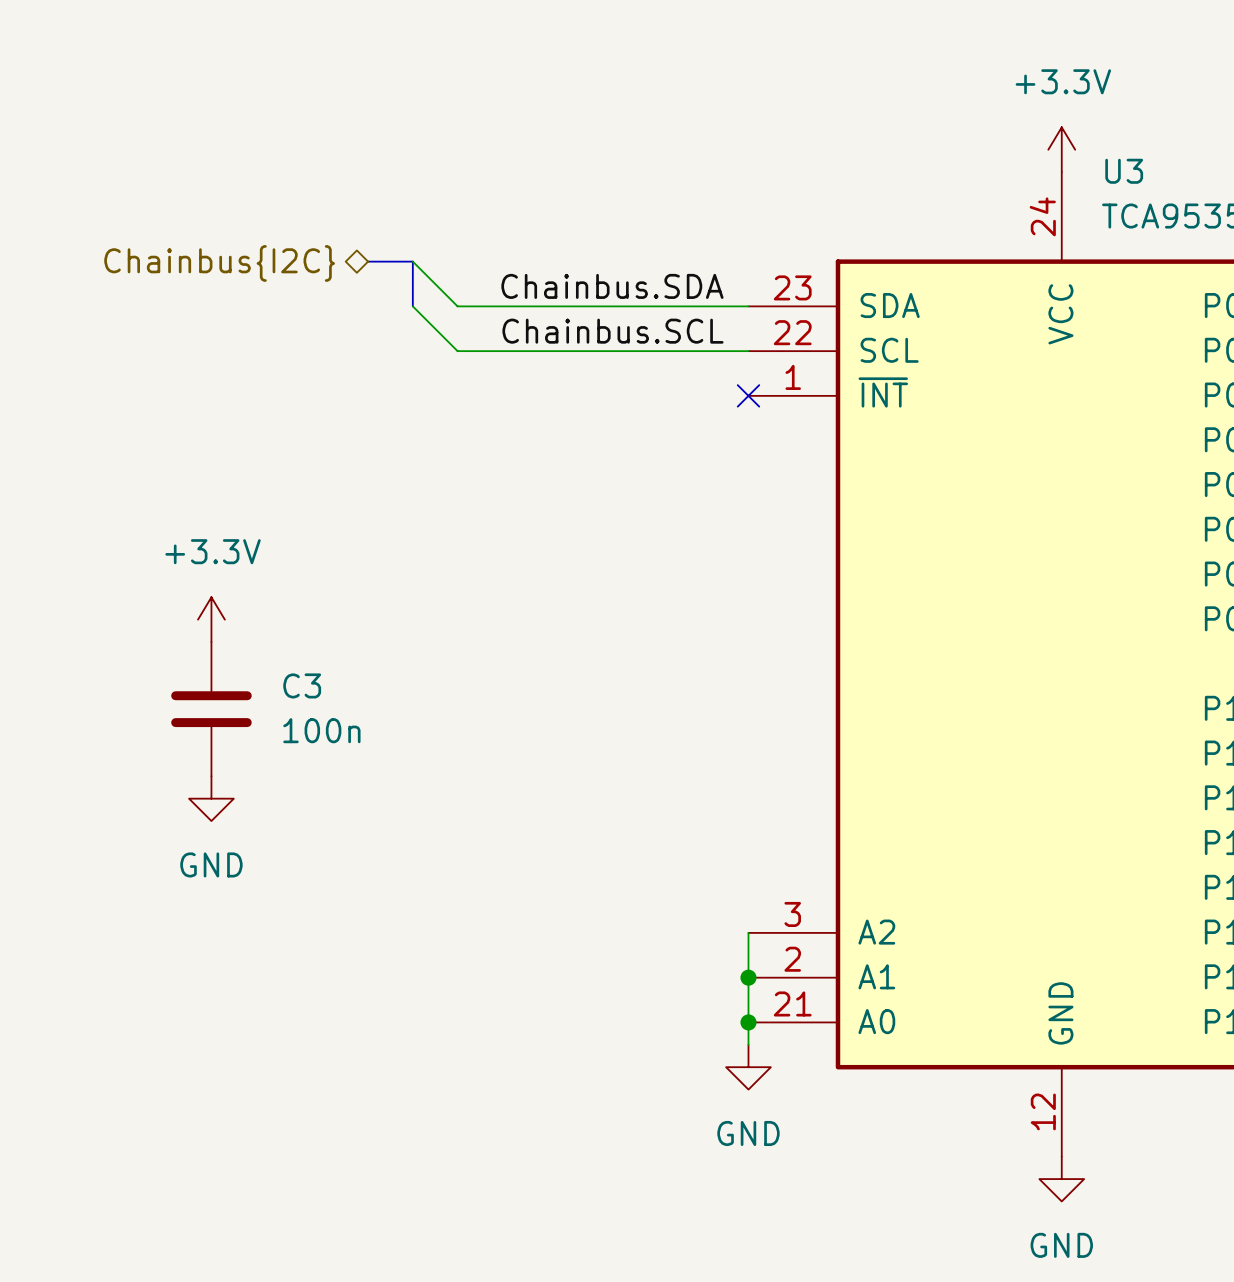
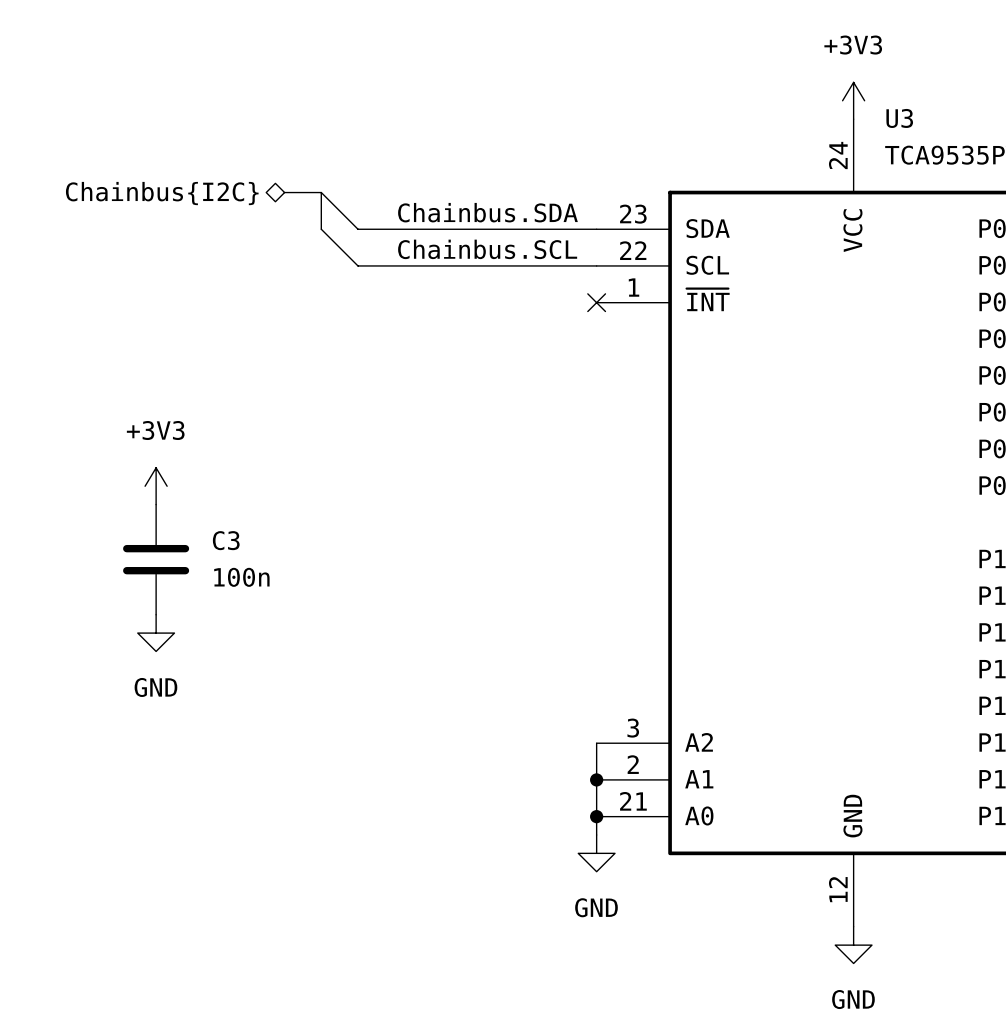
power symbol: +3.3V (1061, 149) -> +3V3 (853, 100)
power symbol: +3.3V (211, 619) -> +3V3 (156, 486)

